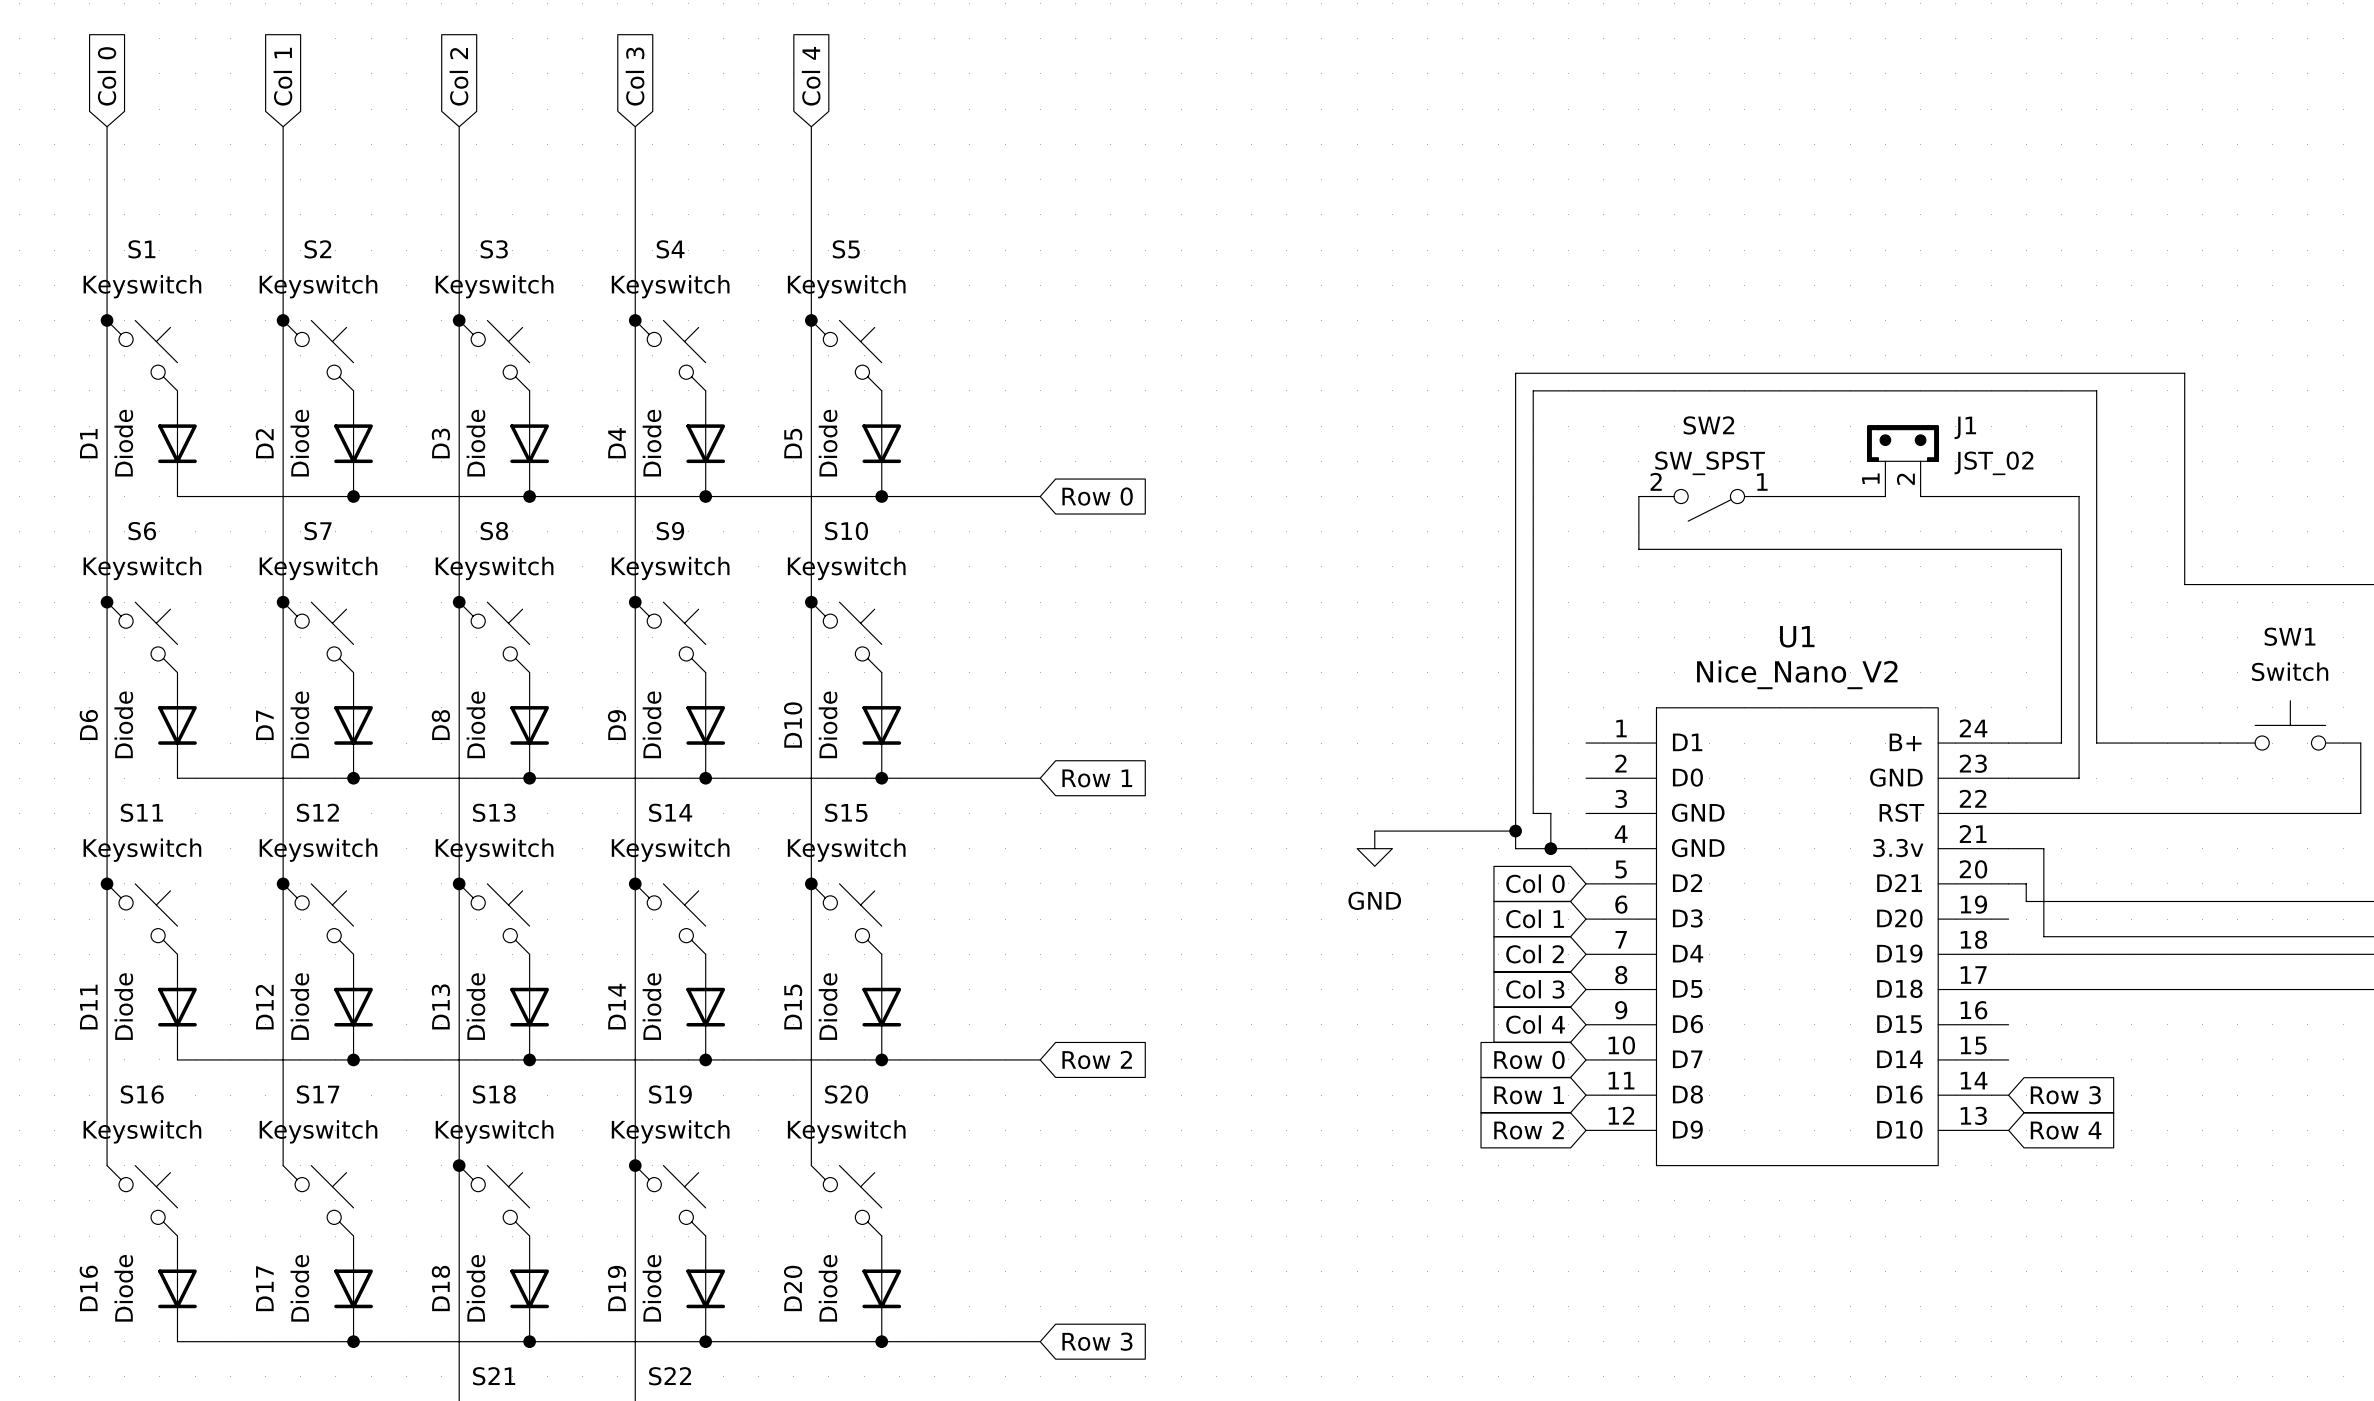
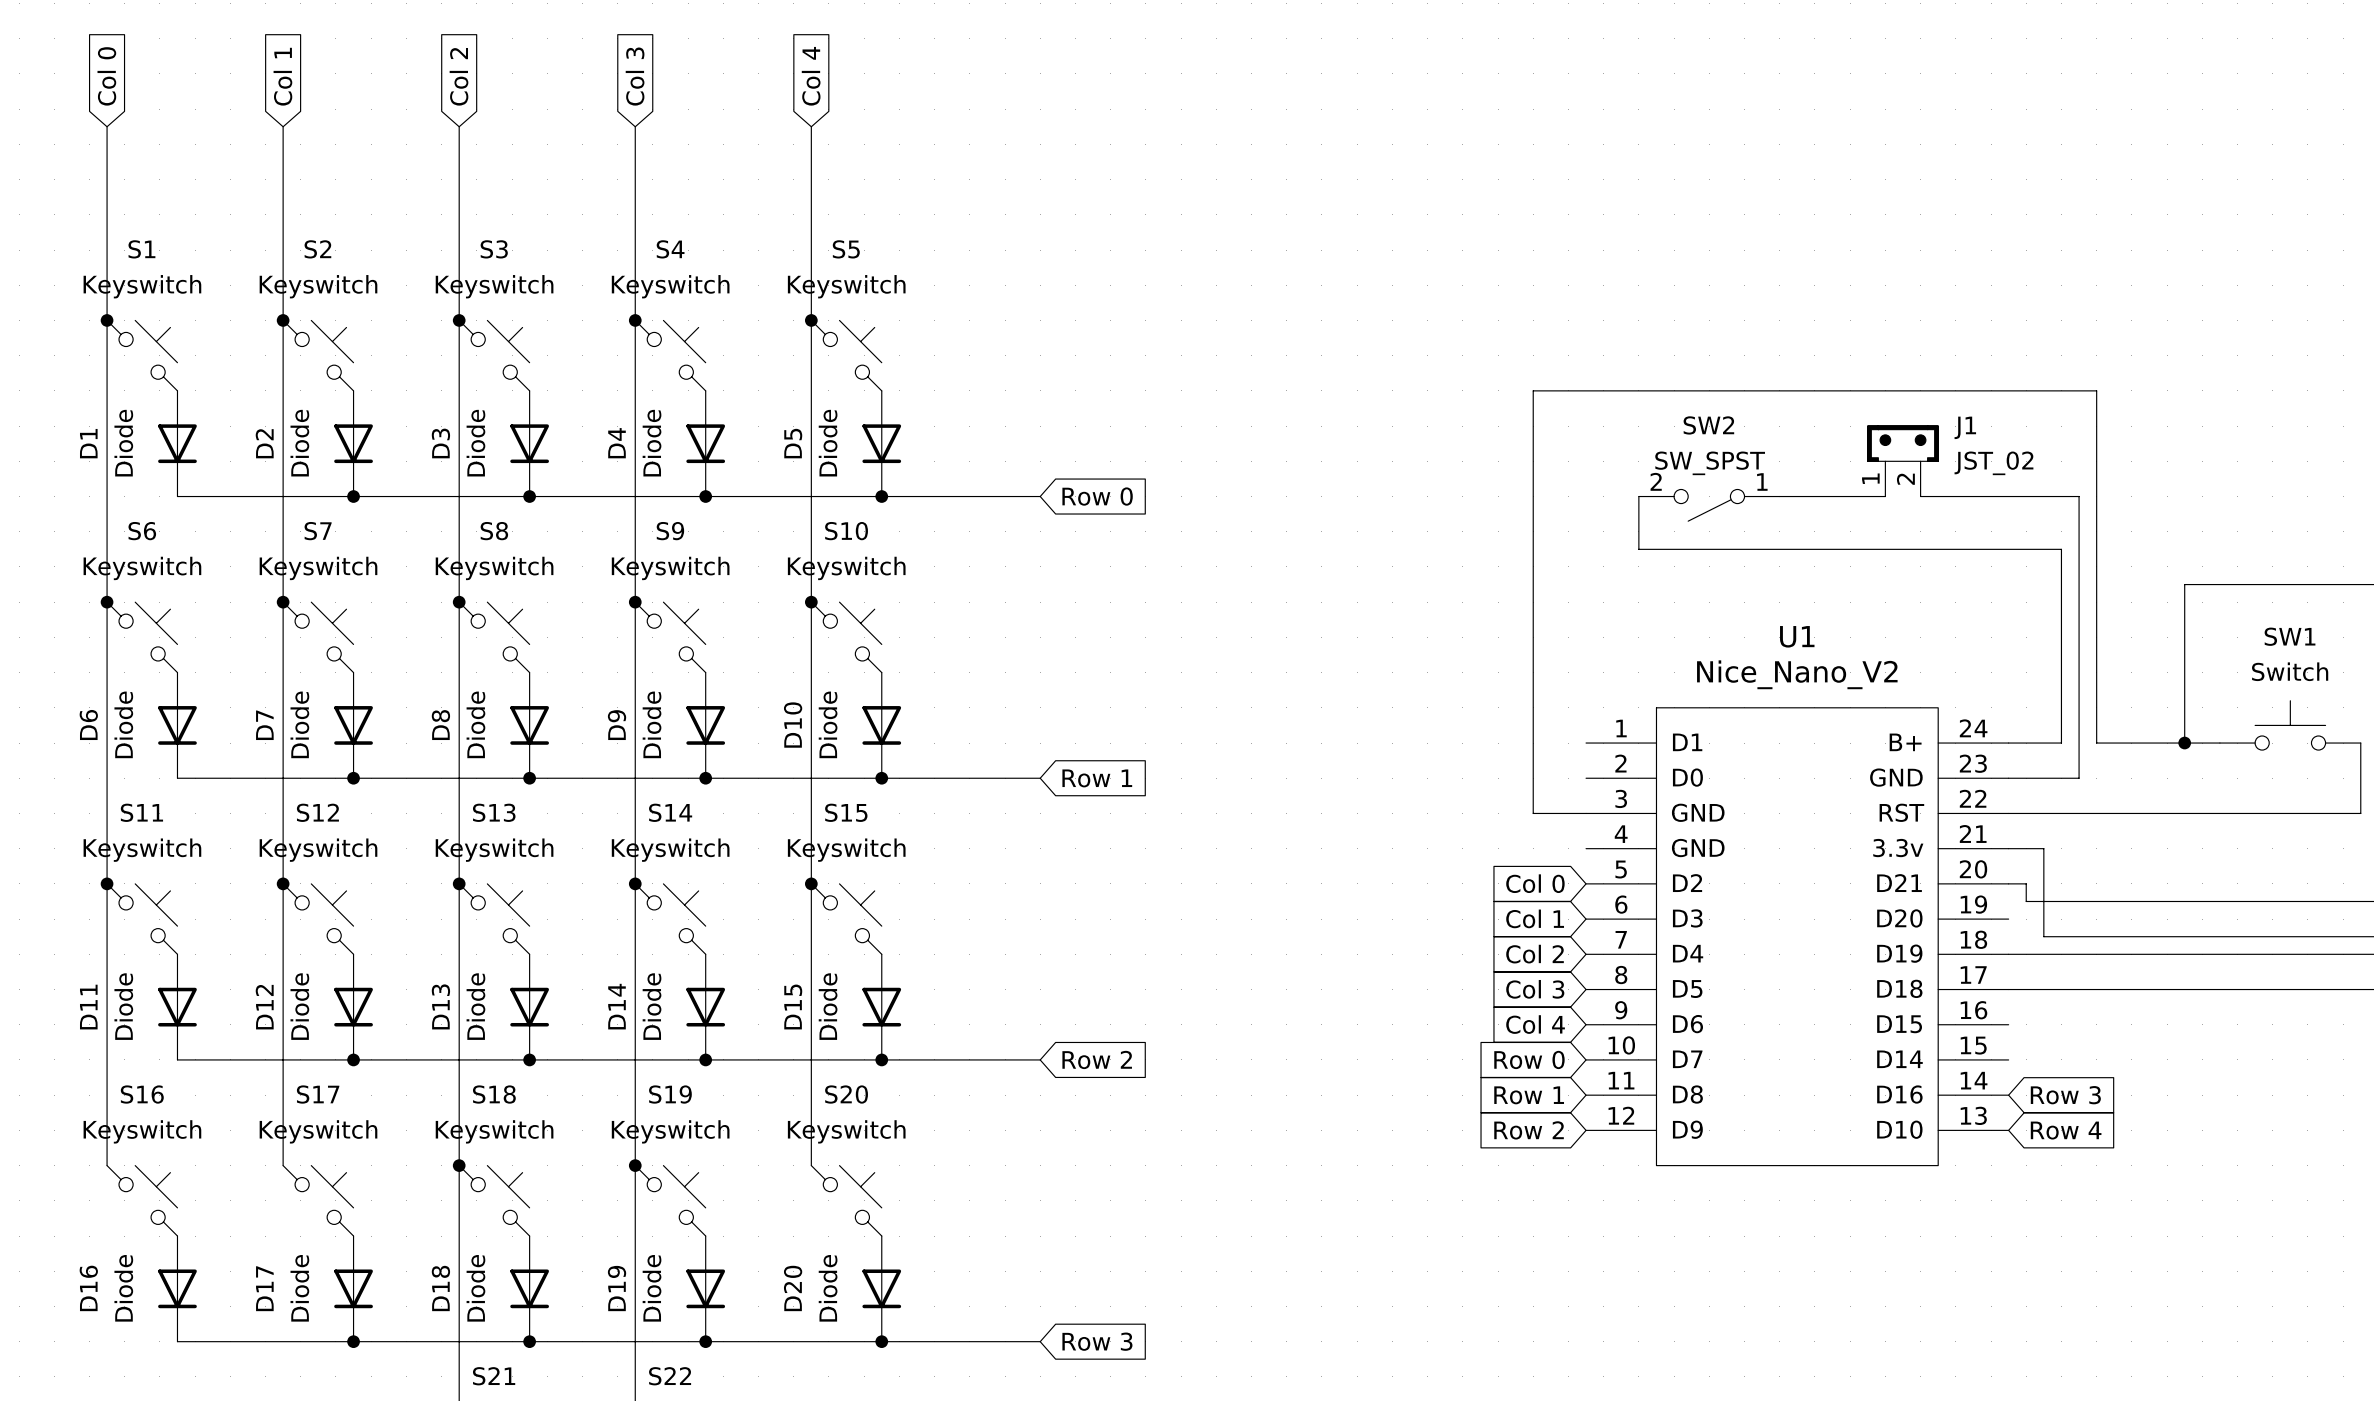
wire: (2184, 584) (2184, 373) (1515, 373) (1515, 848) (1586, 848) -> (2184, 584) (2184, 743)
junction: none -> (2184, 743)
wire: (1550, 813) (1550, 848) -> (1550, 813) (1586, 813)
wire: (1374, 831) (1515, 831) -> none
junction: (1515, 831) -> none
power symbol: GND (1374, 848) -> none
junction: (1550, 848) -> none

